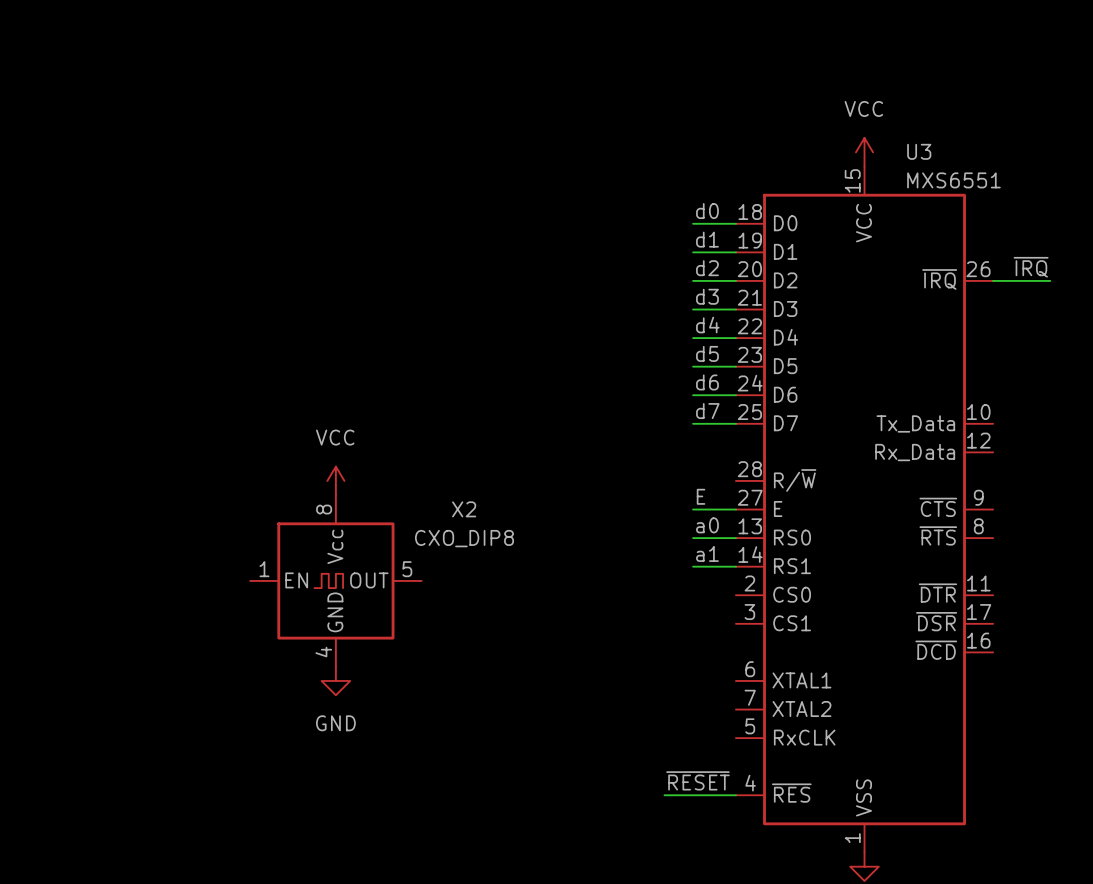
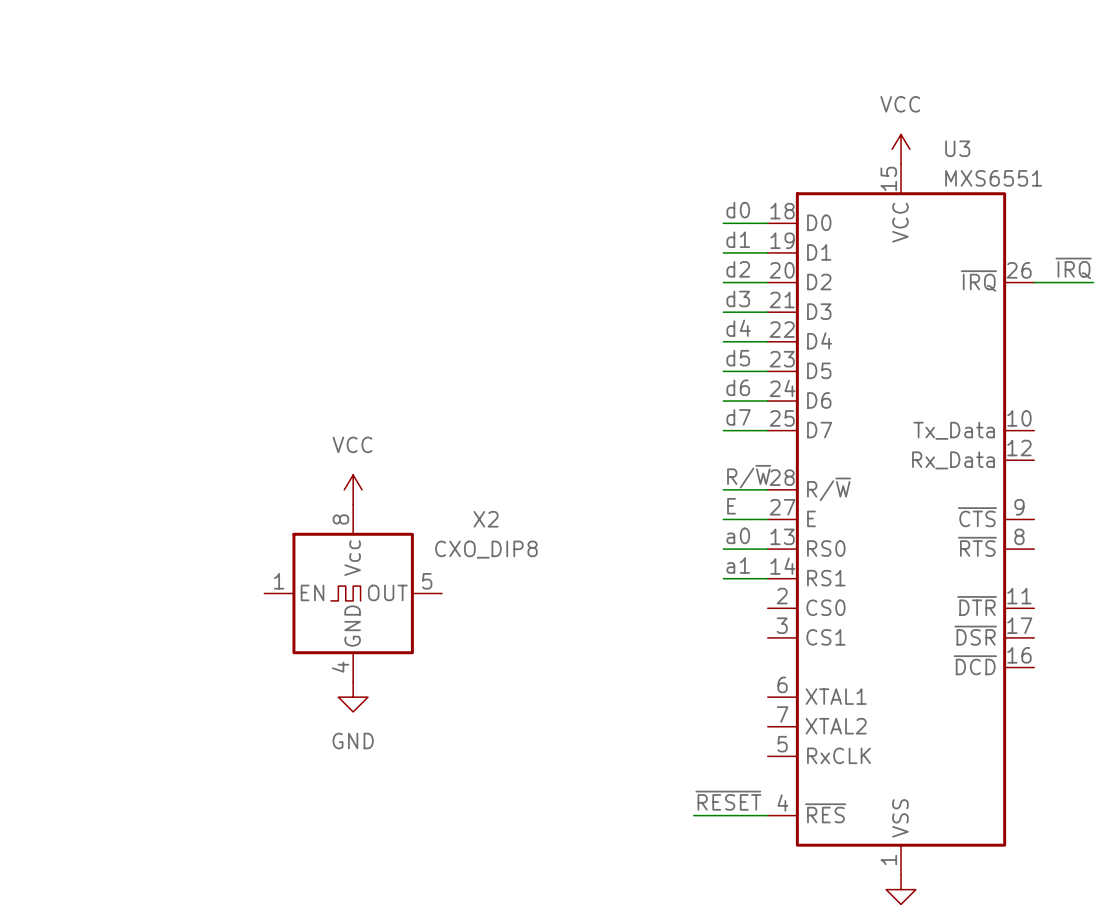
label: none -> R/~{W} (749, 476)
wire: none -> (723, 489) (767, 489)

